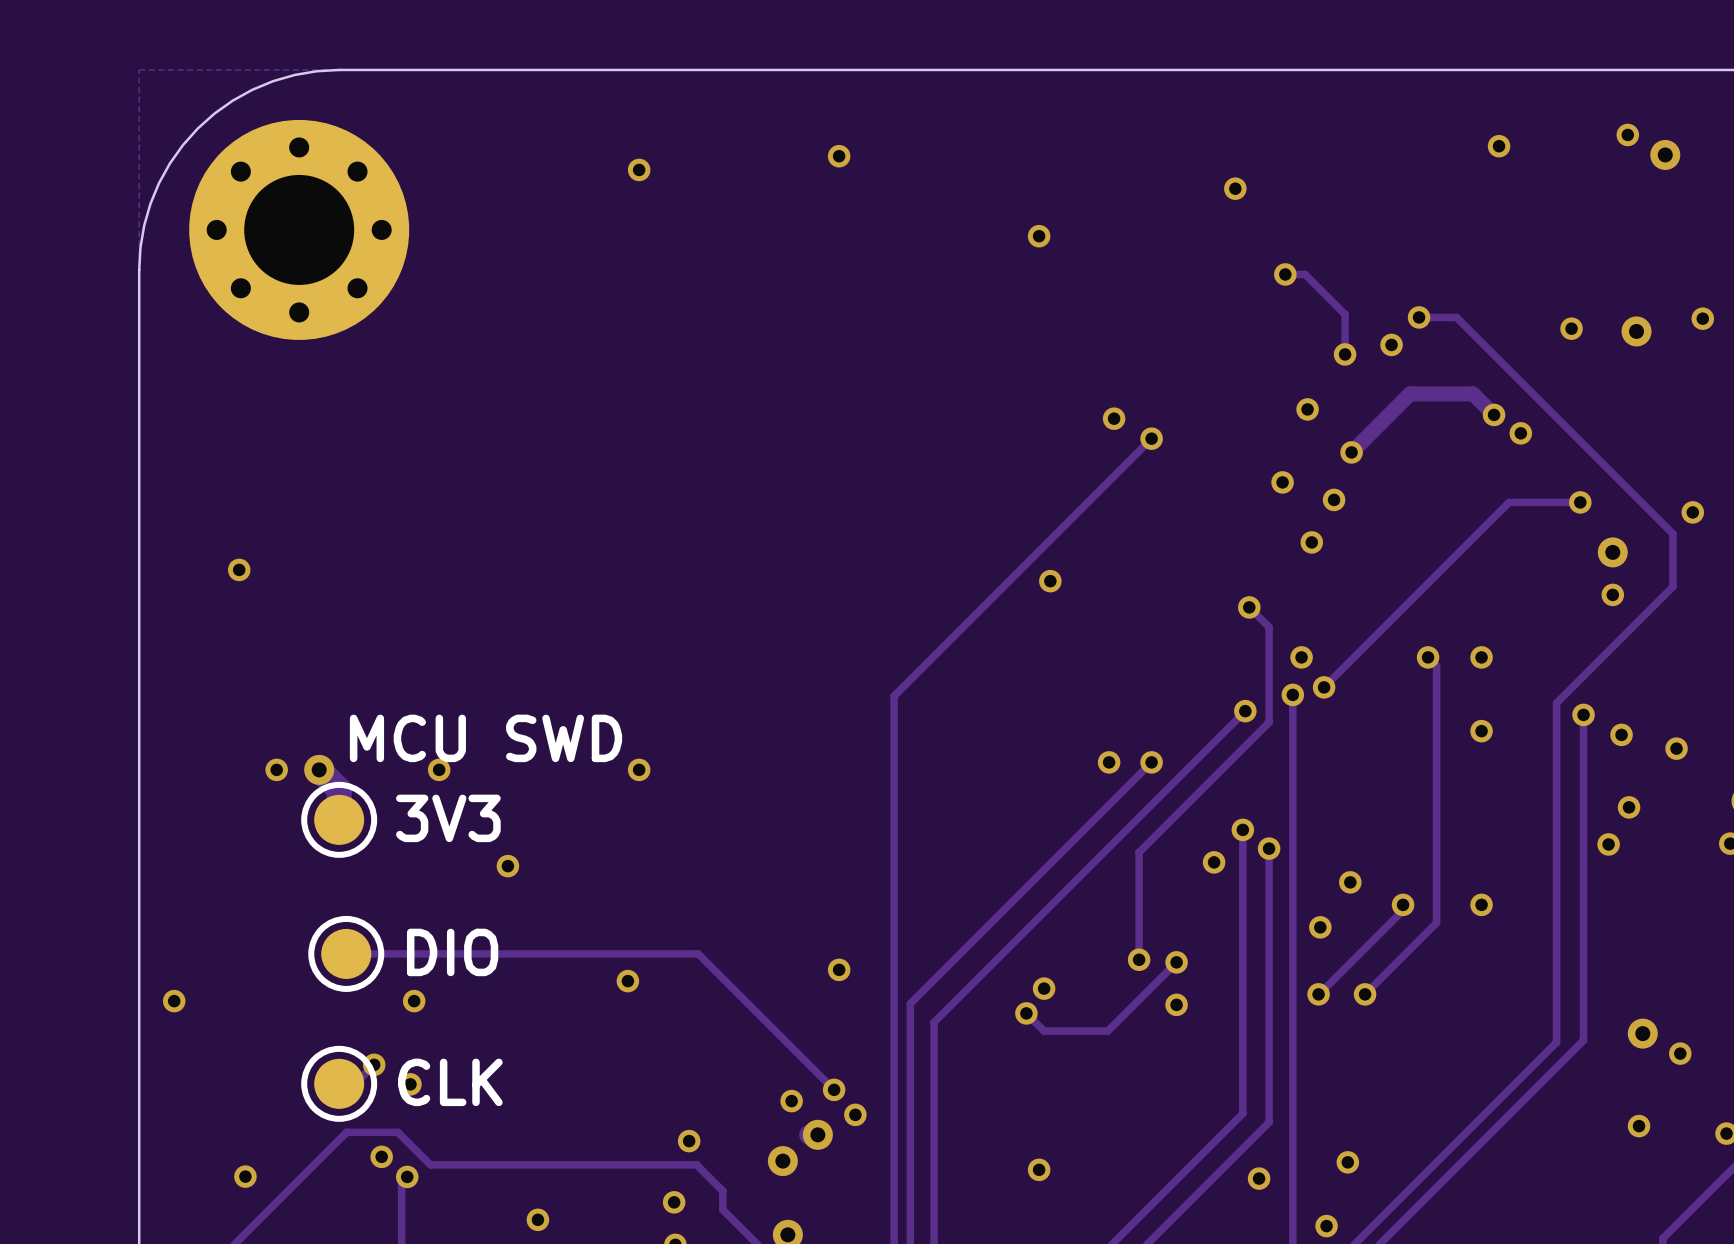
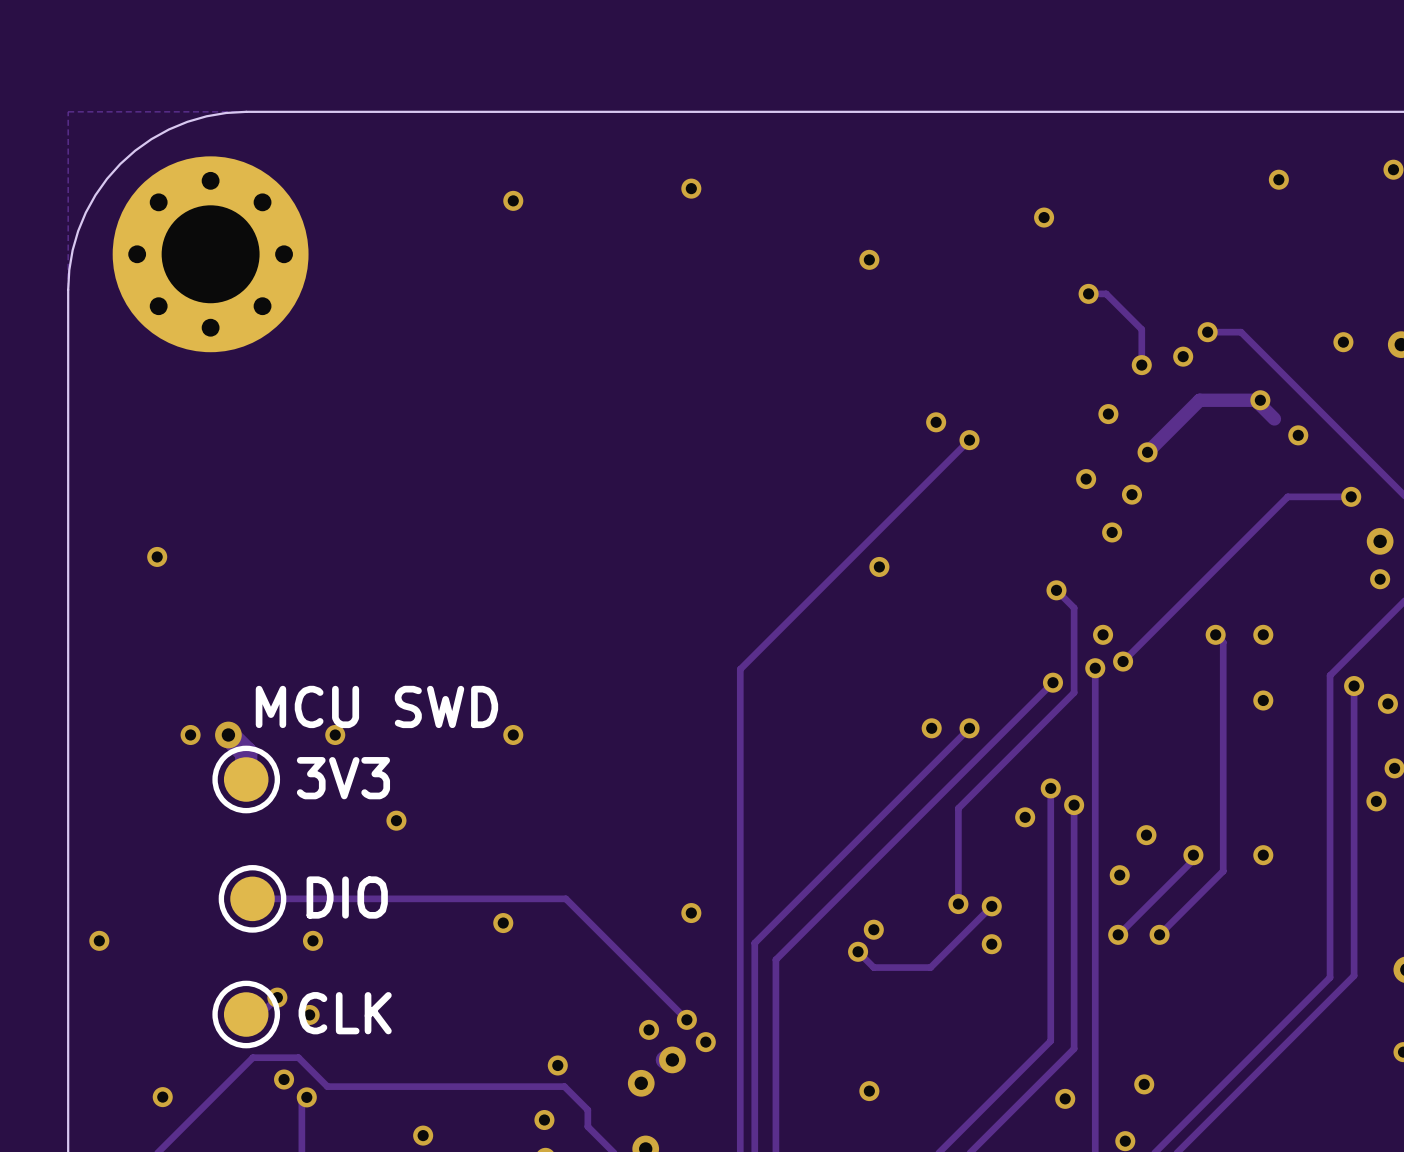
via position: (1494, 414) -> (1260, 400)

